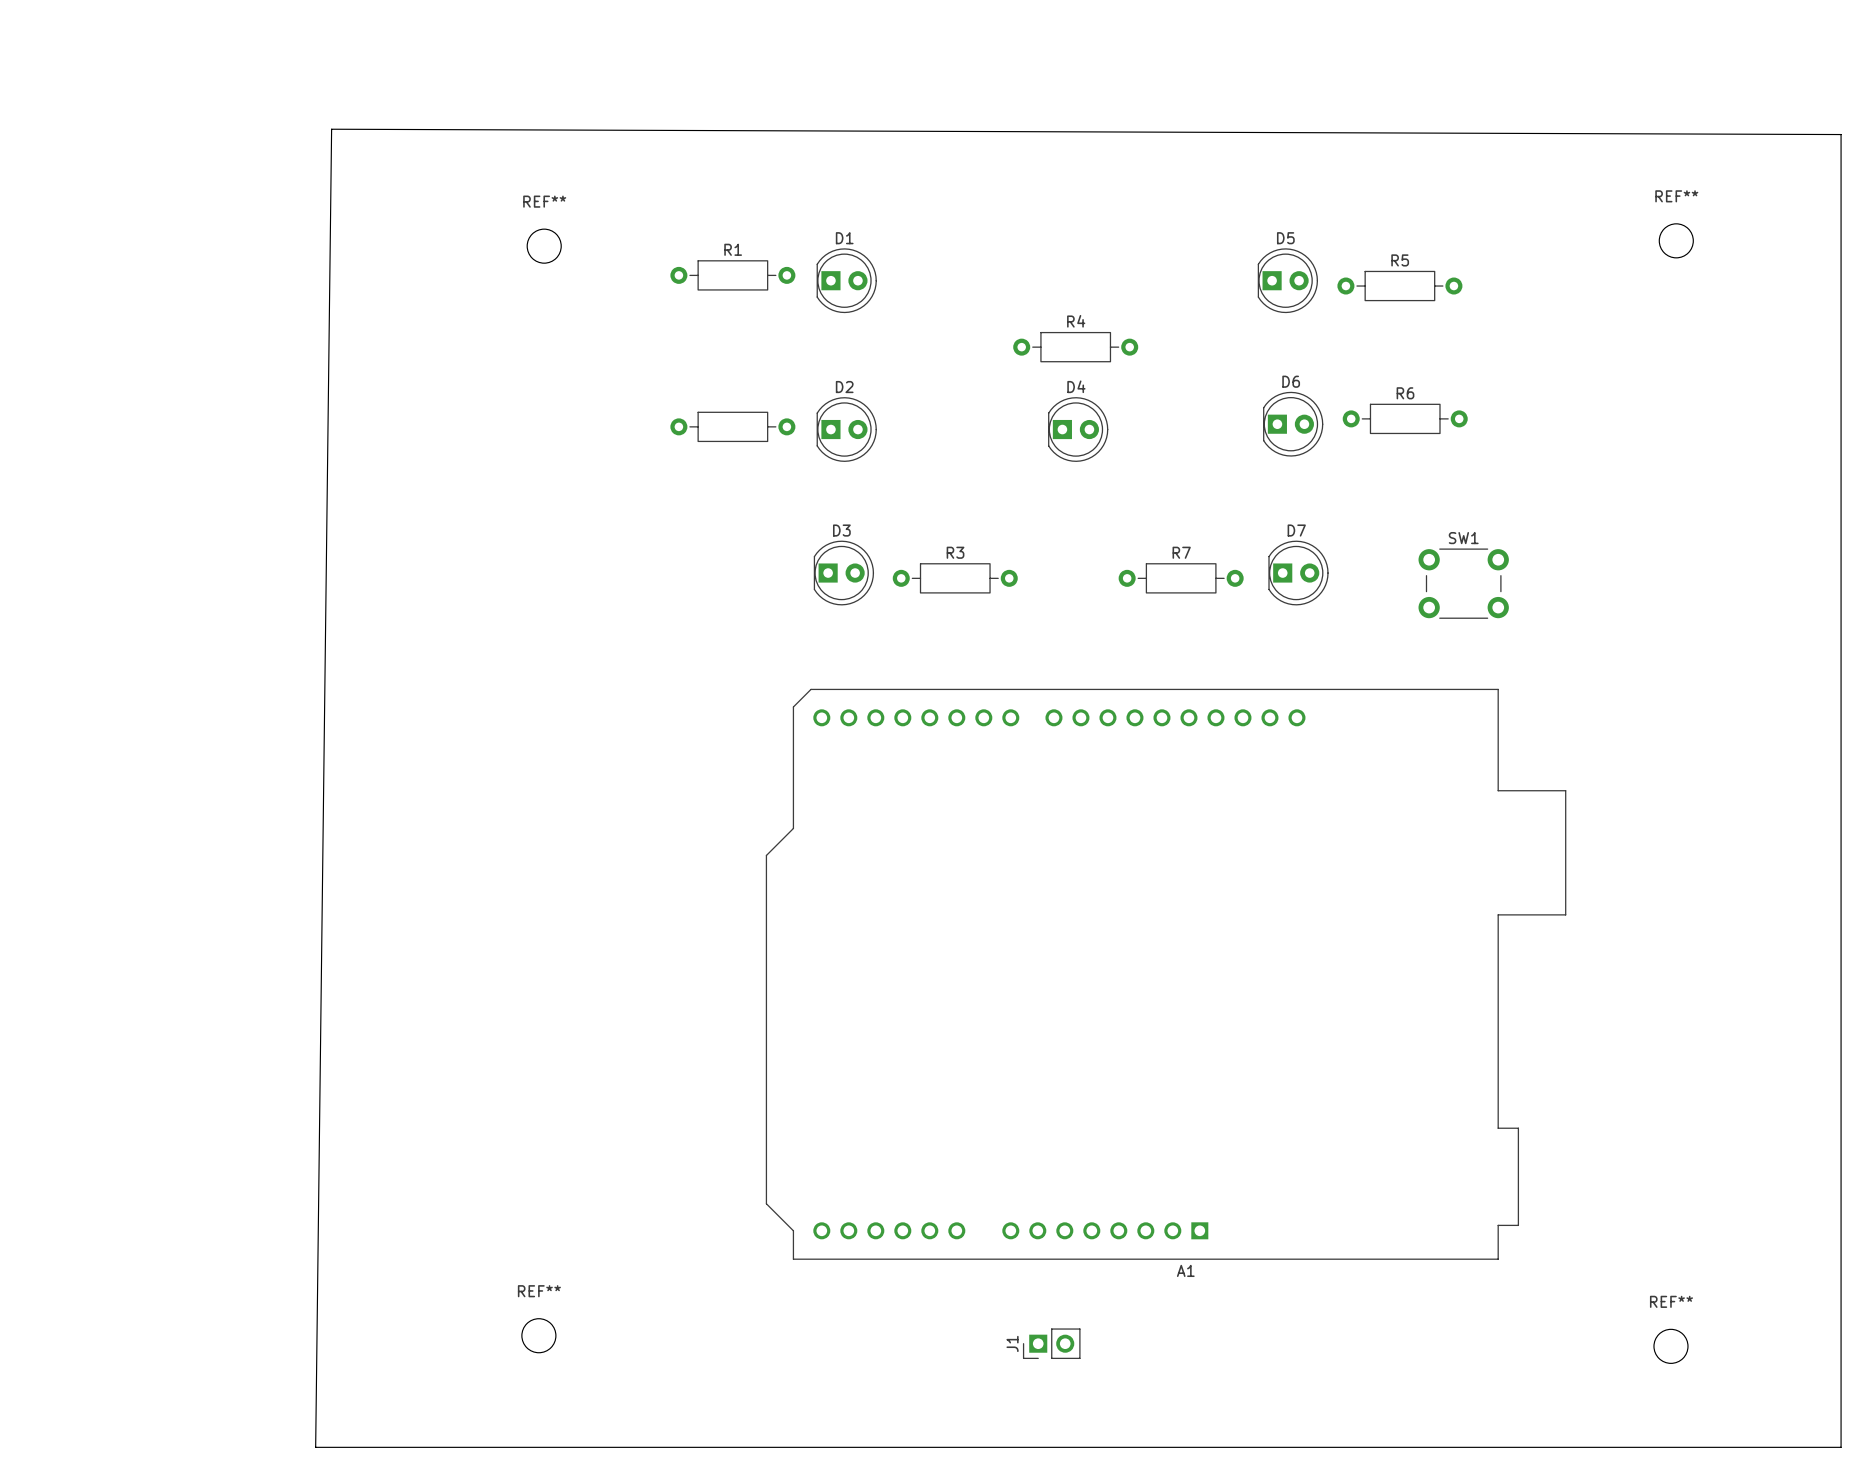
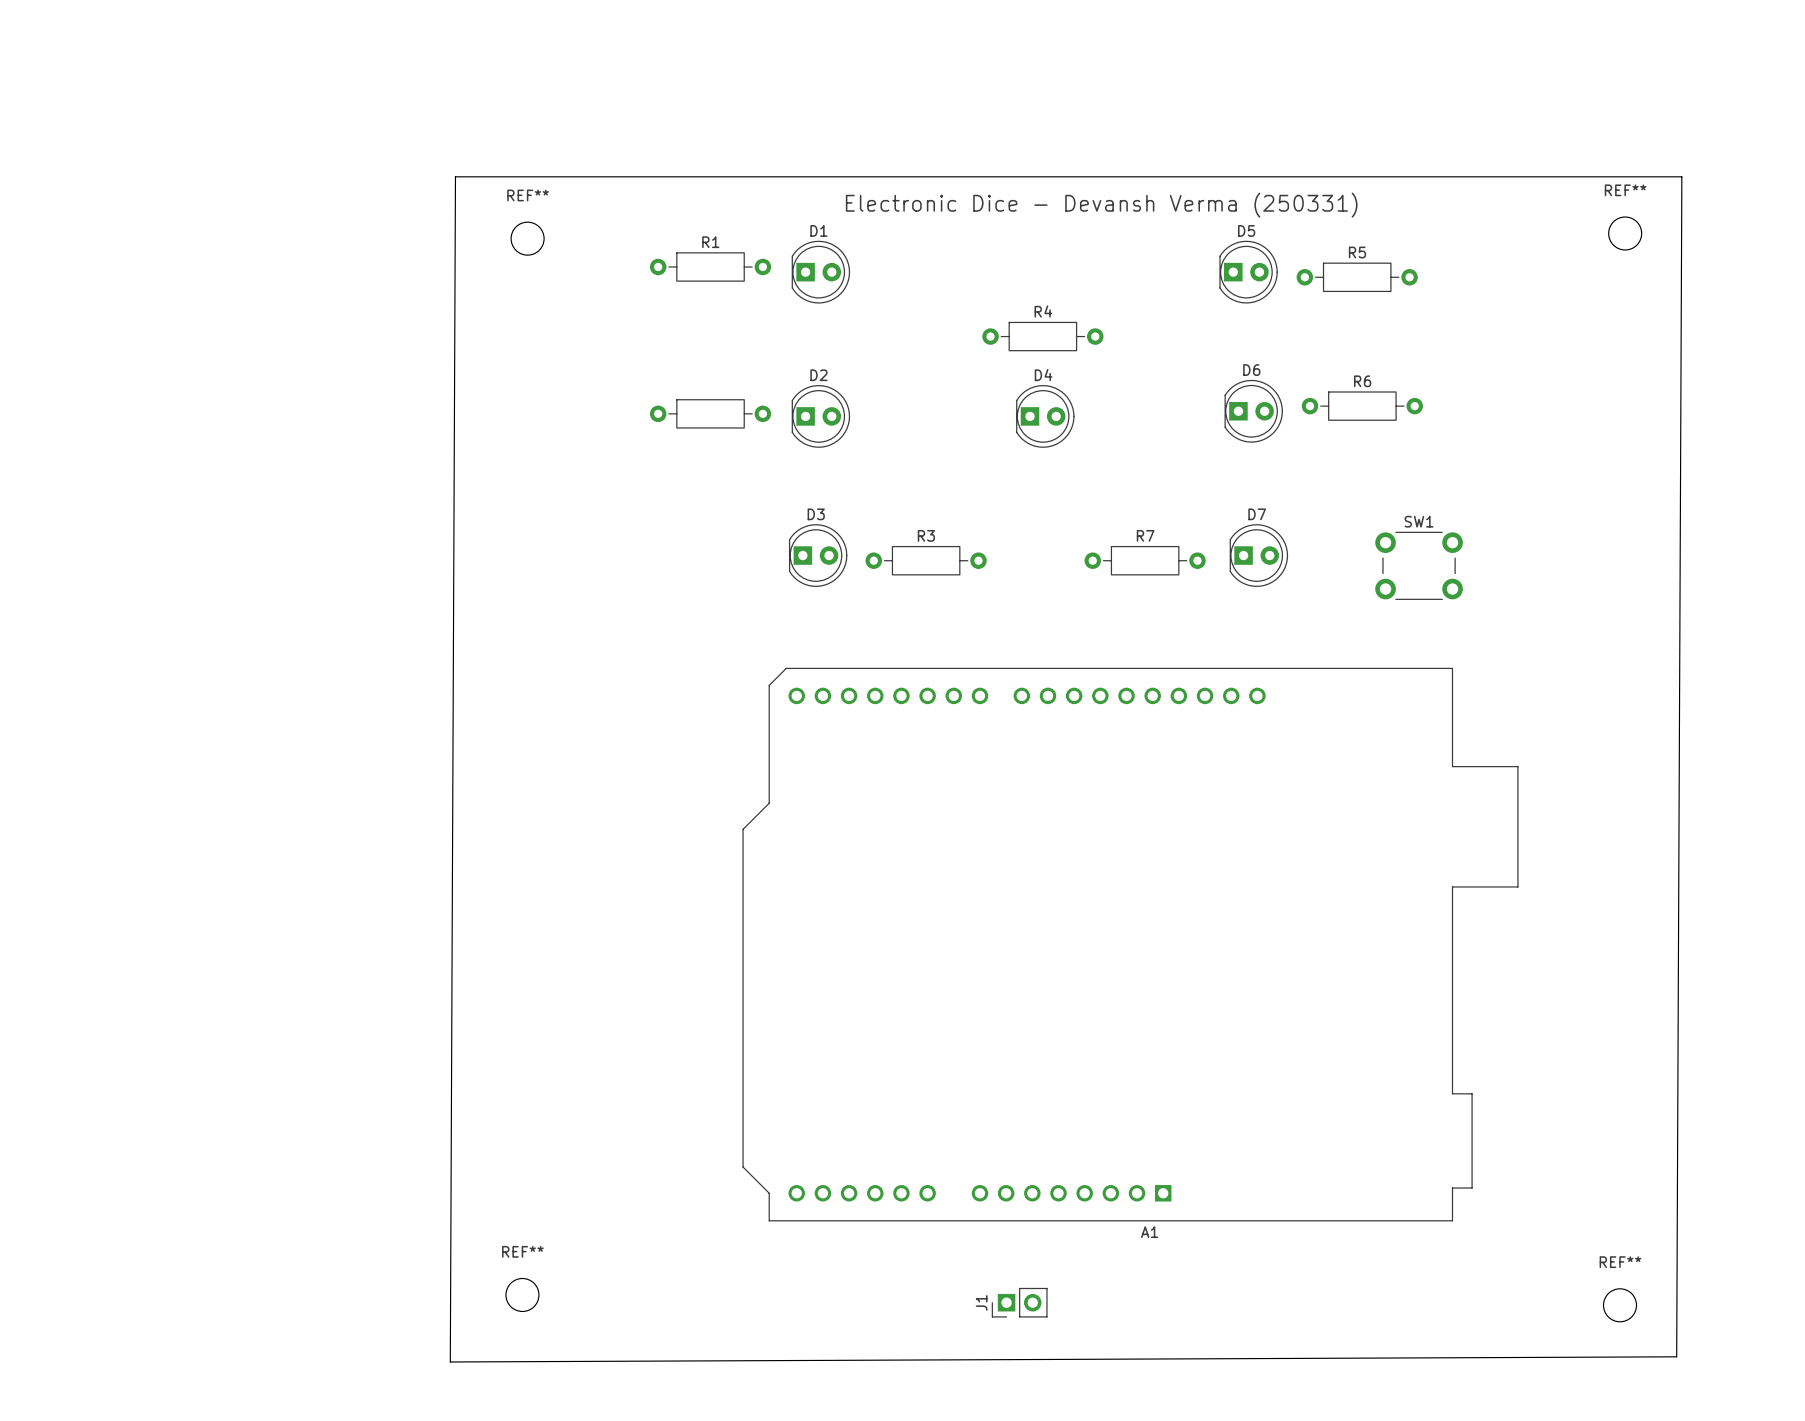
board edge: (331, 129) (315, 1447) (1841, 1447) (1841, 134) (331, 129) -> (455, 176) (450, 1361) (1676, 1356) (1681, 176) (455, 176)
text: none -> Electronic Dice - Devansh Verma (250331) (1101, 205)

